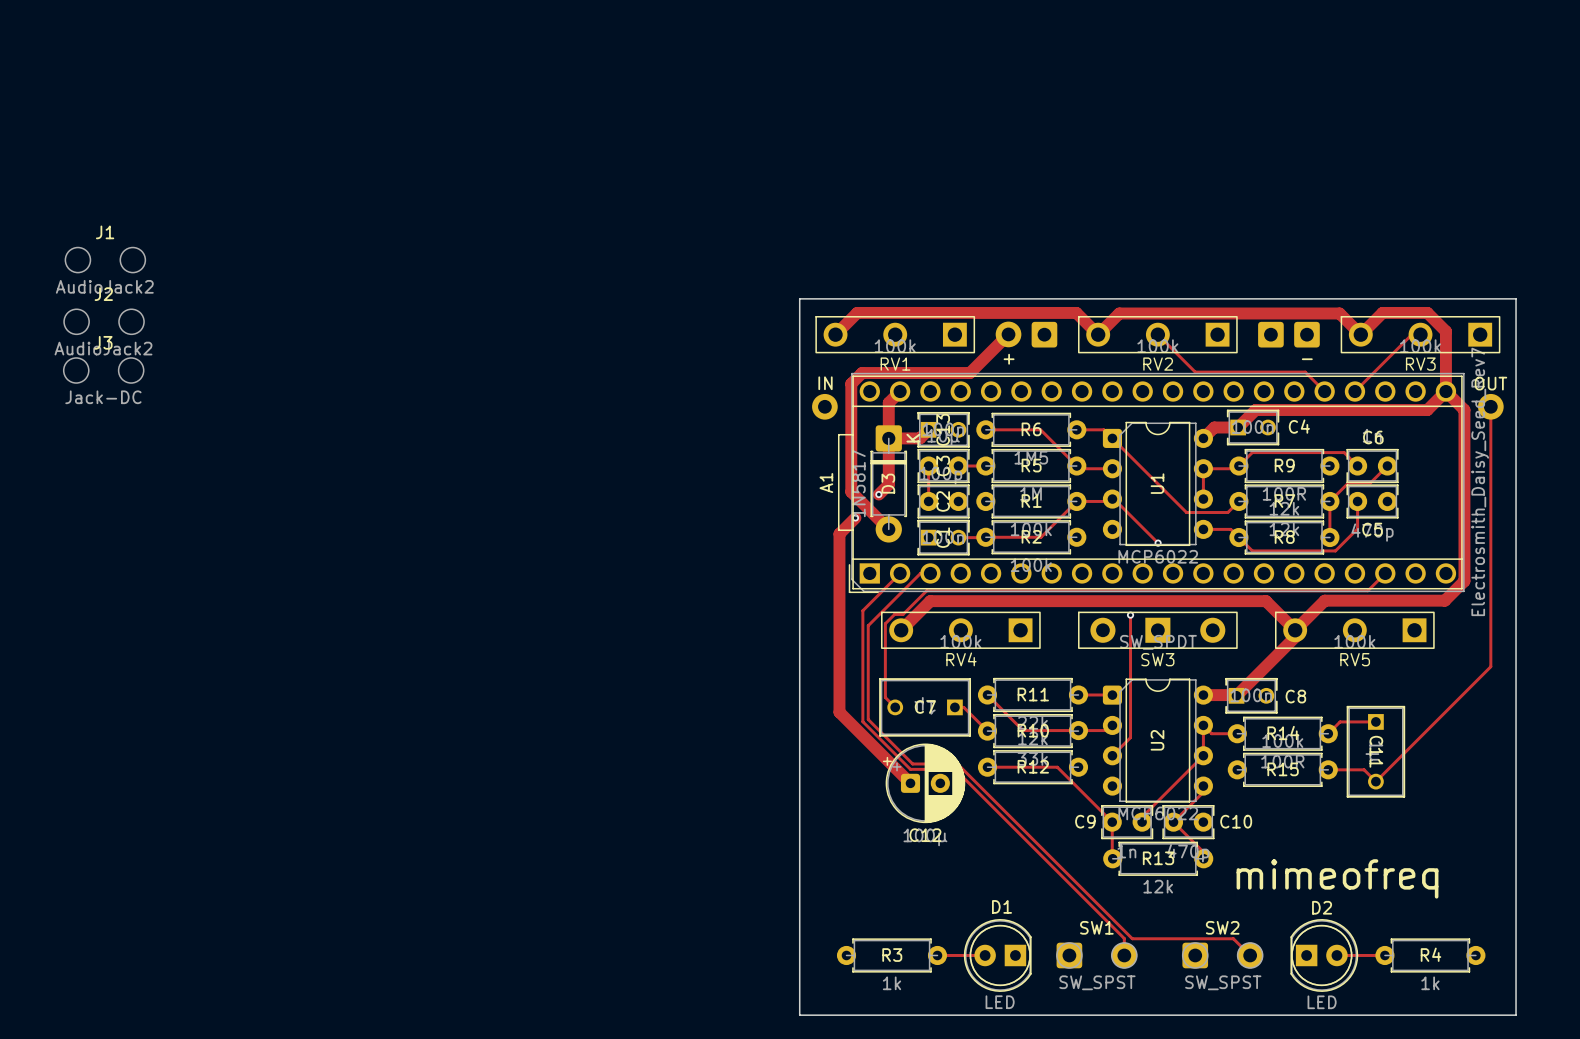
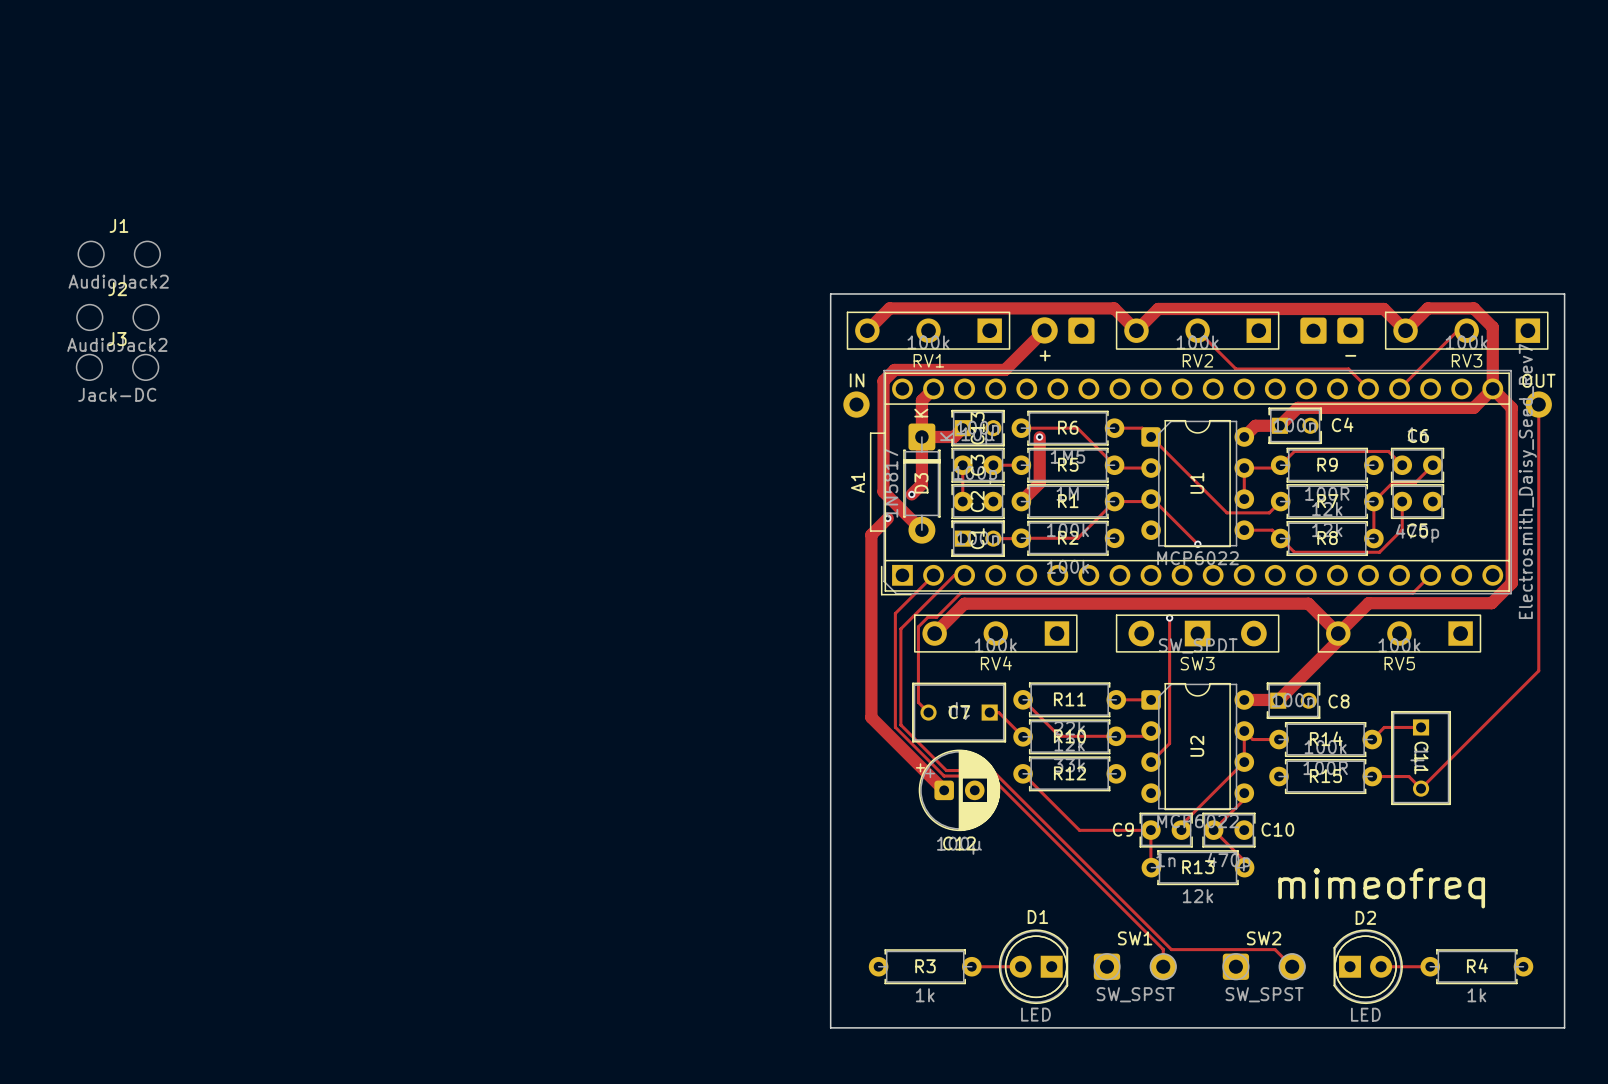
D3 footprint: [870, 425, 908, 543] -> [903, 423, 941, 544]
track: none -> (1039, 437) (1039, 483) (1021, 501)
via: none -> (1039, 437)
track: (987, 767) (1057, 767) (1112, 822) -> (1023, 773) (1079, 830) (1150, 830)

